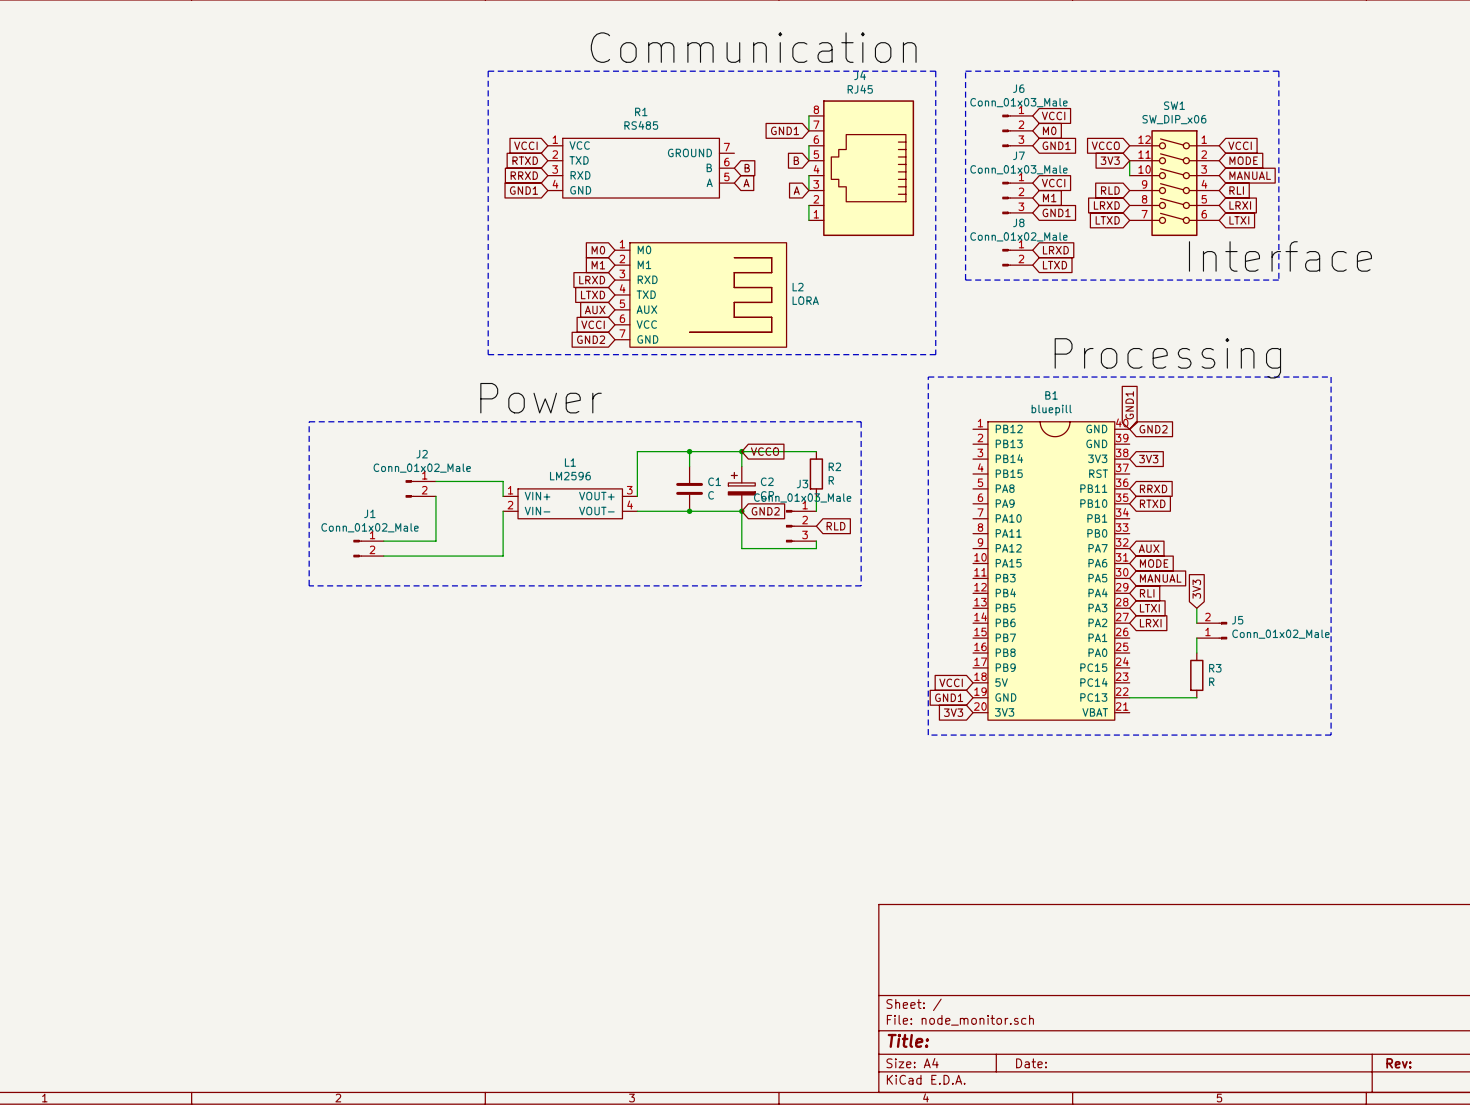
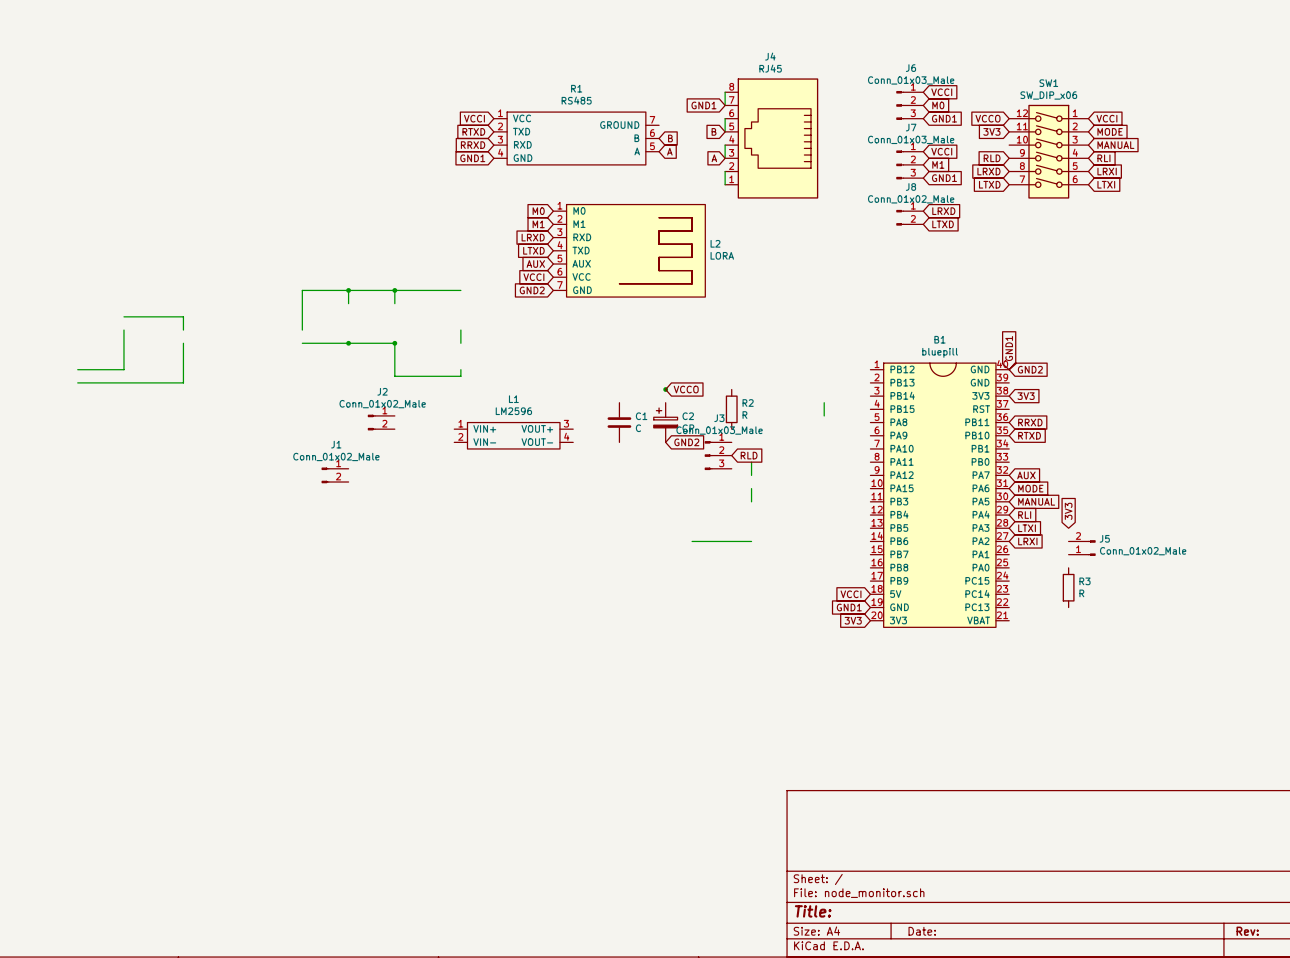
label: Communication (753, 47) -> none
line: (488, 71) (935, 71) (935, 354) (488, 354) (488, 71) -> none
line: (965, 71) (1278, 71) (1278, 280) (965, 280) (965, 71) -> none
wire: (1129, 160) (1129, 175) -> none
label: Interface (1280, 256) -> none
wire: none -> (348, 290) (348, 303)
junction: none -> (348, 290)
wire: none -> (394, 290) (394, 303)
junction: none -> (394, 290)
wire: none -> (460, 290) (302, 290) (302, 330)
label: Processing (1167, 358) -> none
wire: none -> (123, 316) (183, 316) (183, 330)
line: (928, 377) (928, 735) (1331, 735) (1331, 377) (928, 377) -> none
wire: none -> (123, 330) (123, 369) (77, 369)
wire: none -> (460, 330) (460, 343)
label: Power (541, 398) -> none
wire: none -> (183, 343) (183, 382) (77, 382)
wire: none -> (302, 343) (394, 343) (394, 376) (460, 376) (460, 369)
junction: none -> (348, 343)
junction: none -> (394, 343)
line: (309, 421) (309, 585) (861, 585) (861, 421) (309, 421) -> none
wire: (689, 451) (689, 466) -> none
junction: (689, 451) -> none
wire: (741, 451) (741, 466) -> none
wire: (816, 451) (637, 451) (637, 496) -> none
wire: none -> (824, 402) (824, 415)
wire: (435, 481) (503, 481) (503, 496) -> none
wire: (435, 496) (435, 541) (383, 541) -> none
wire: (816, 496) (816, 511) -> (751, 462) (751, 475)
wire: (503, 511) (503, 556) (383, 556) -> none
wire: (637, 511) (741, 511) (741, 548) (816, 548) (816, 541) -> none
junction: (689, 511) -> none
junction: (741, 511) -> none
wire: none -> (751, 488) (751, 501)
wire: (1196, 608) (1196, 623) -> none
wire: none -> (692, 541) (751, 541)
wire: (1196, 638) (1196, 653) -> none
wire: (1129, 697) (1196, 697) -> none

